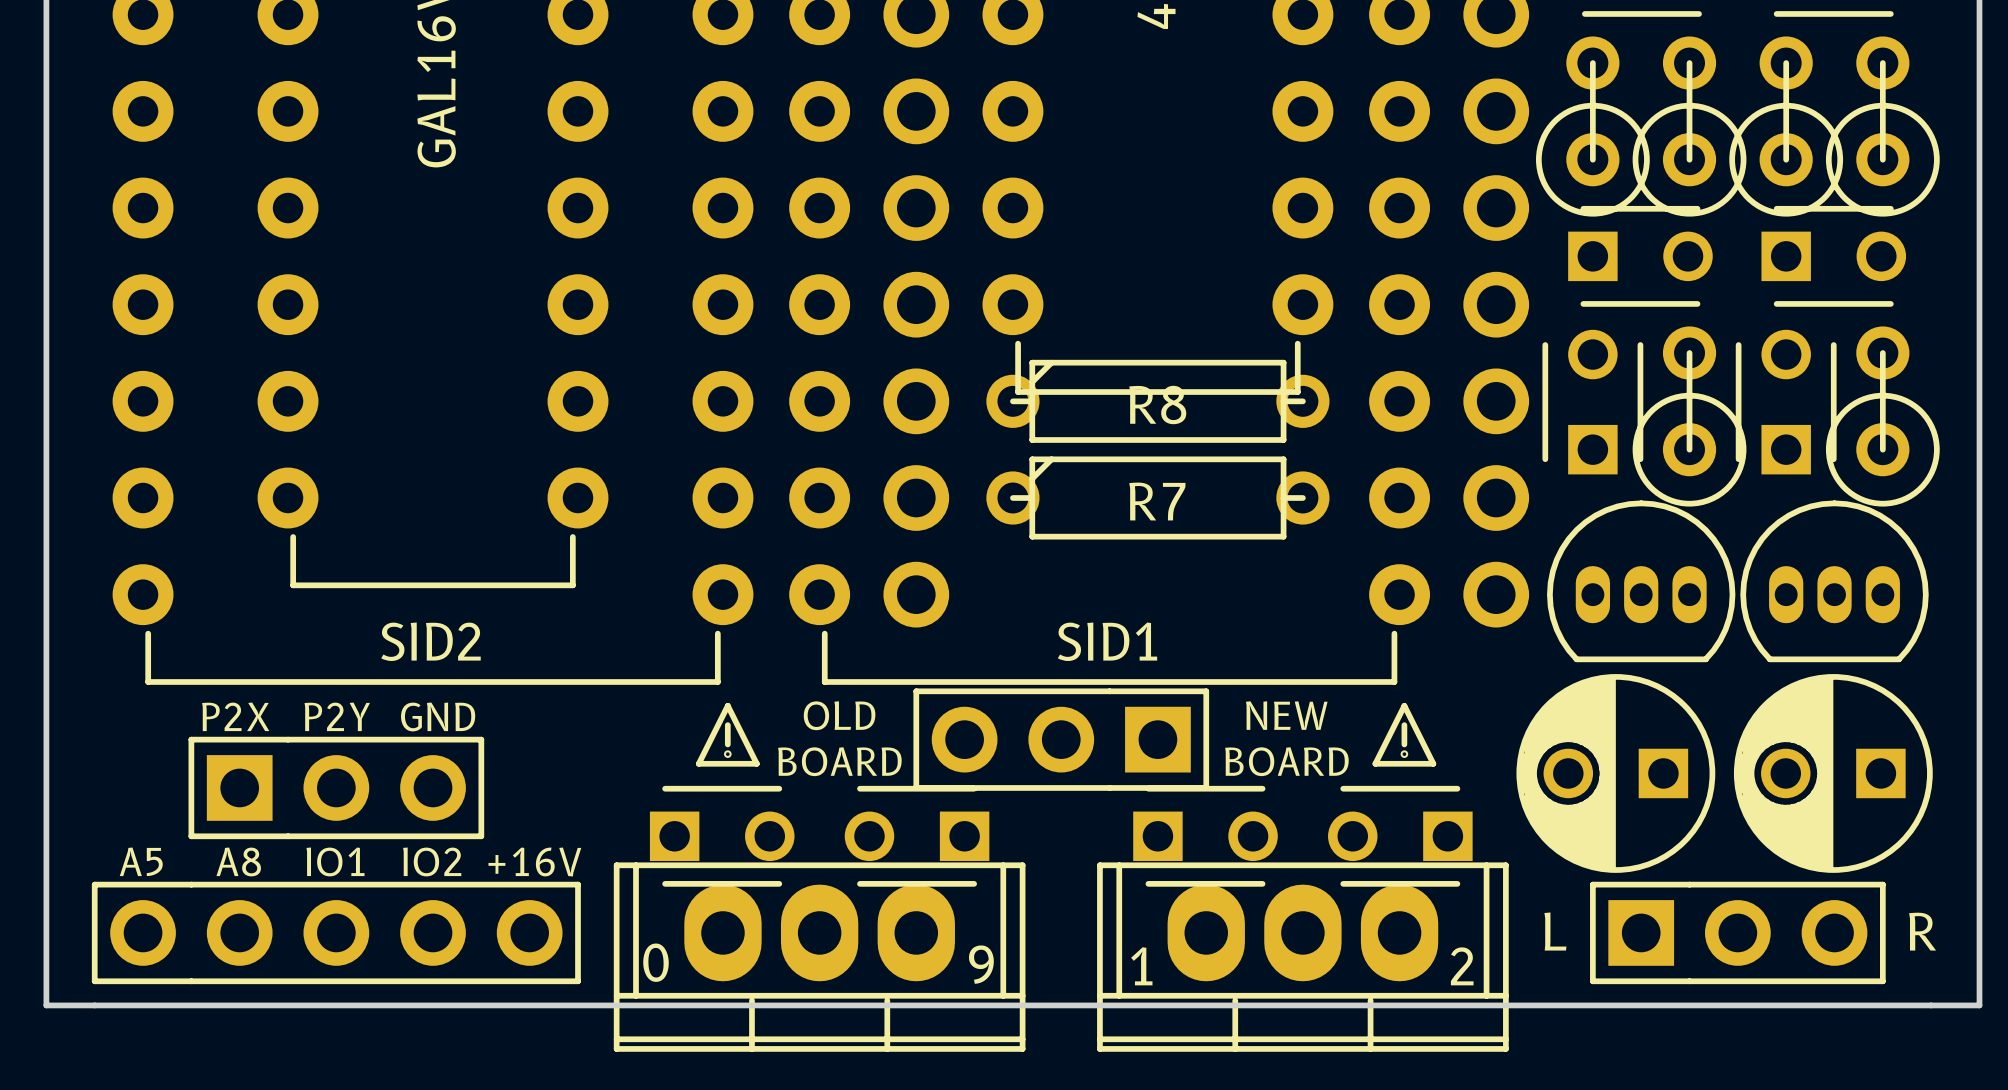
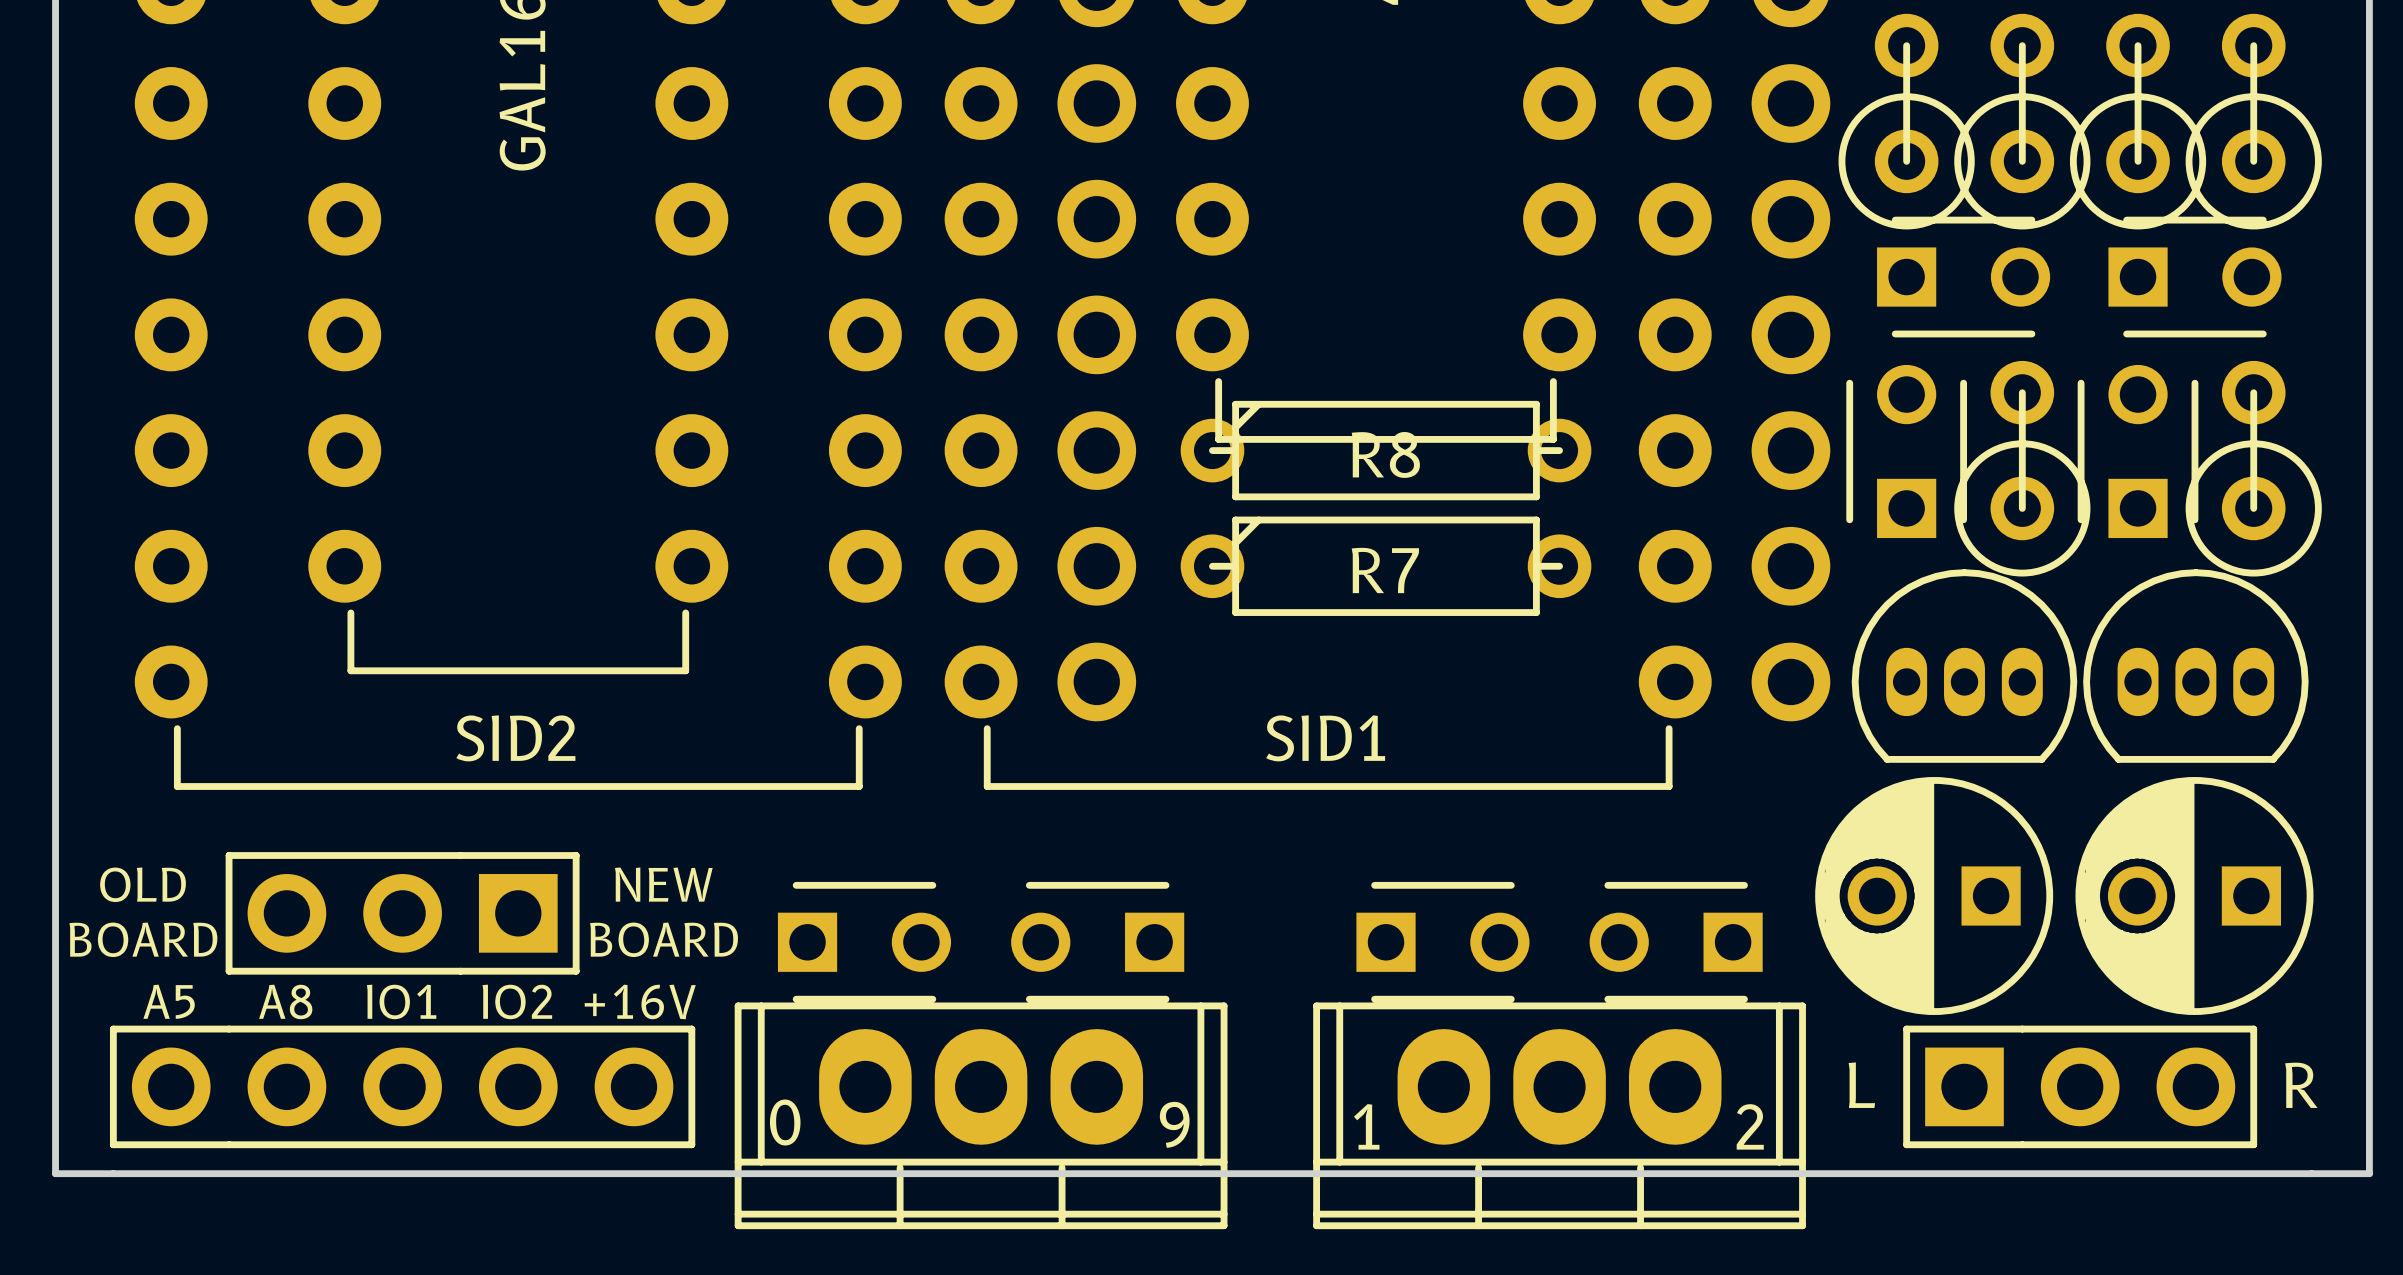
drawing: [695, 702, 760, 767] -> none
drawing: [1372, 702, 1437, 767] -> none
text position: OLD (839, 715) -> OLD (143, 884)
text position: NEW (1286, 715) -> NEW (663, 884)
text: P2X (235, 716) -> none
text: P2Y (337, 716) -> none
text: GND (438, 716) -> none
part: (1061, 739) -> none
text position: BOARD (839, 761) -> BOARD (664, 939)
text: BOARD (1286, 761) -> none
part rotation: 0° (336, 787) -> 180° (402, 913)
text: none -> BOARD (143, 939)
part position: (722, 836) -> (864, 942)
part position: (917, 836) -> (1097, 942)
part position: (1205, 836) -> (1442, 942)
part position: (1400, 836) -> (1676, 942)

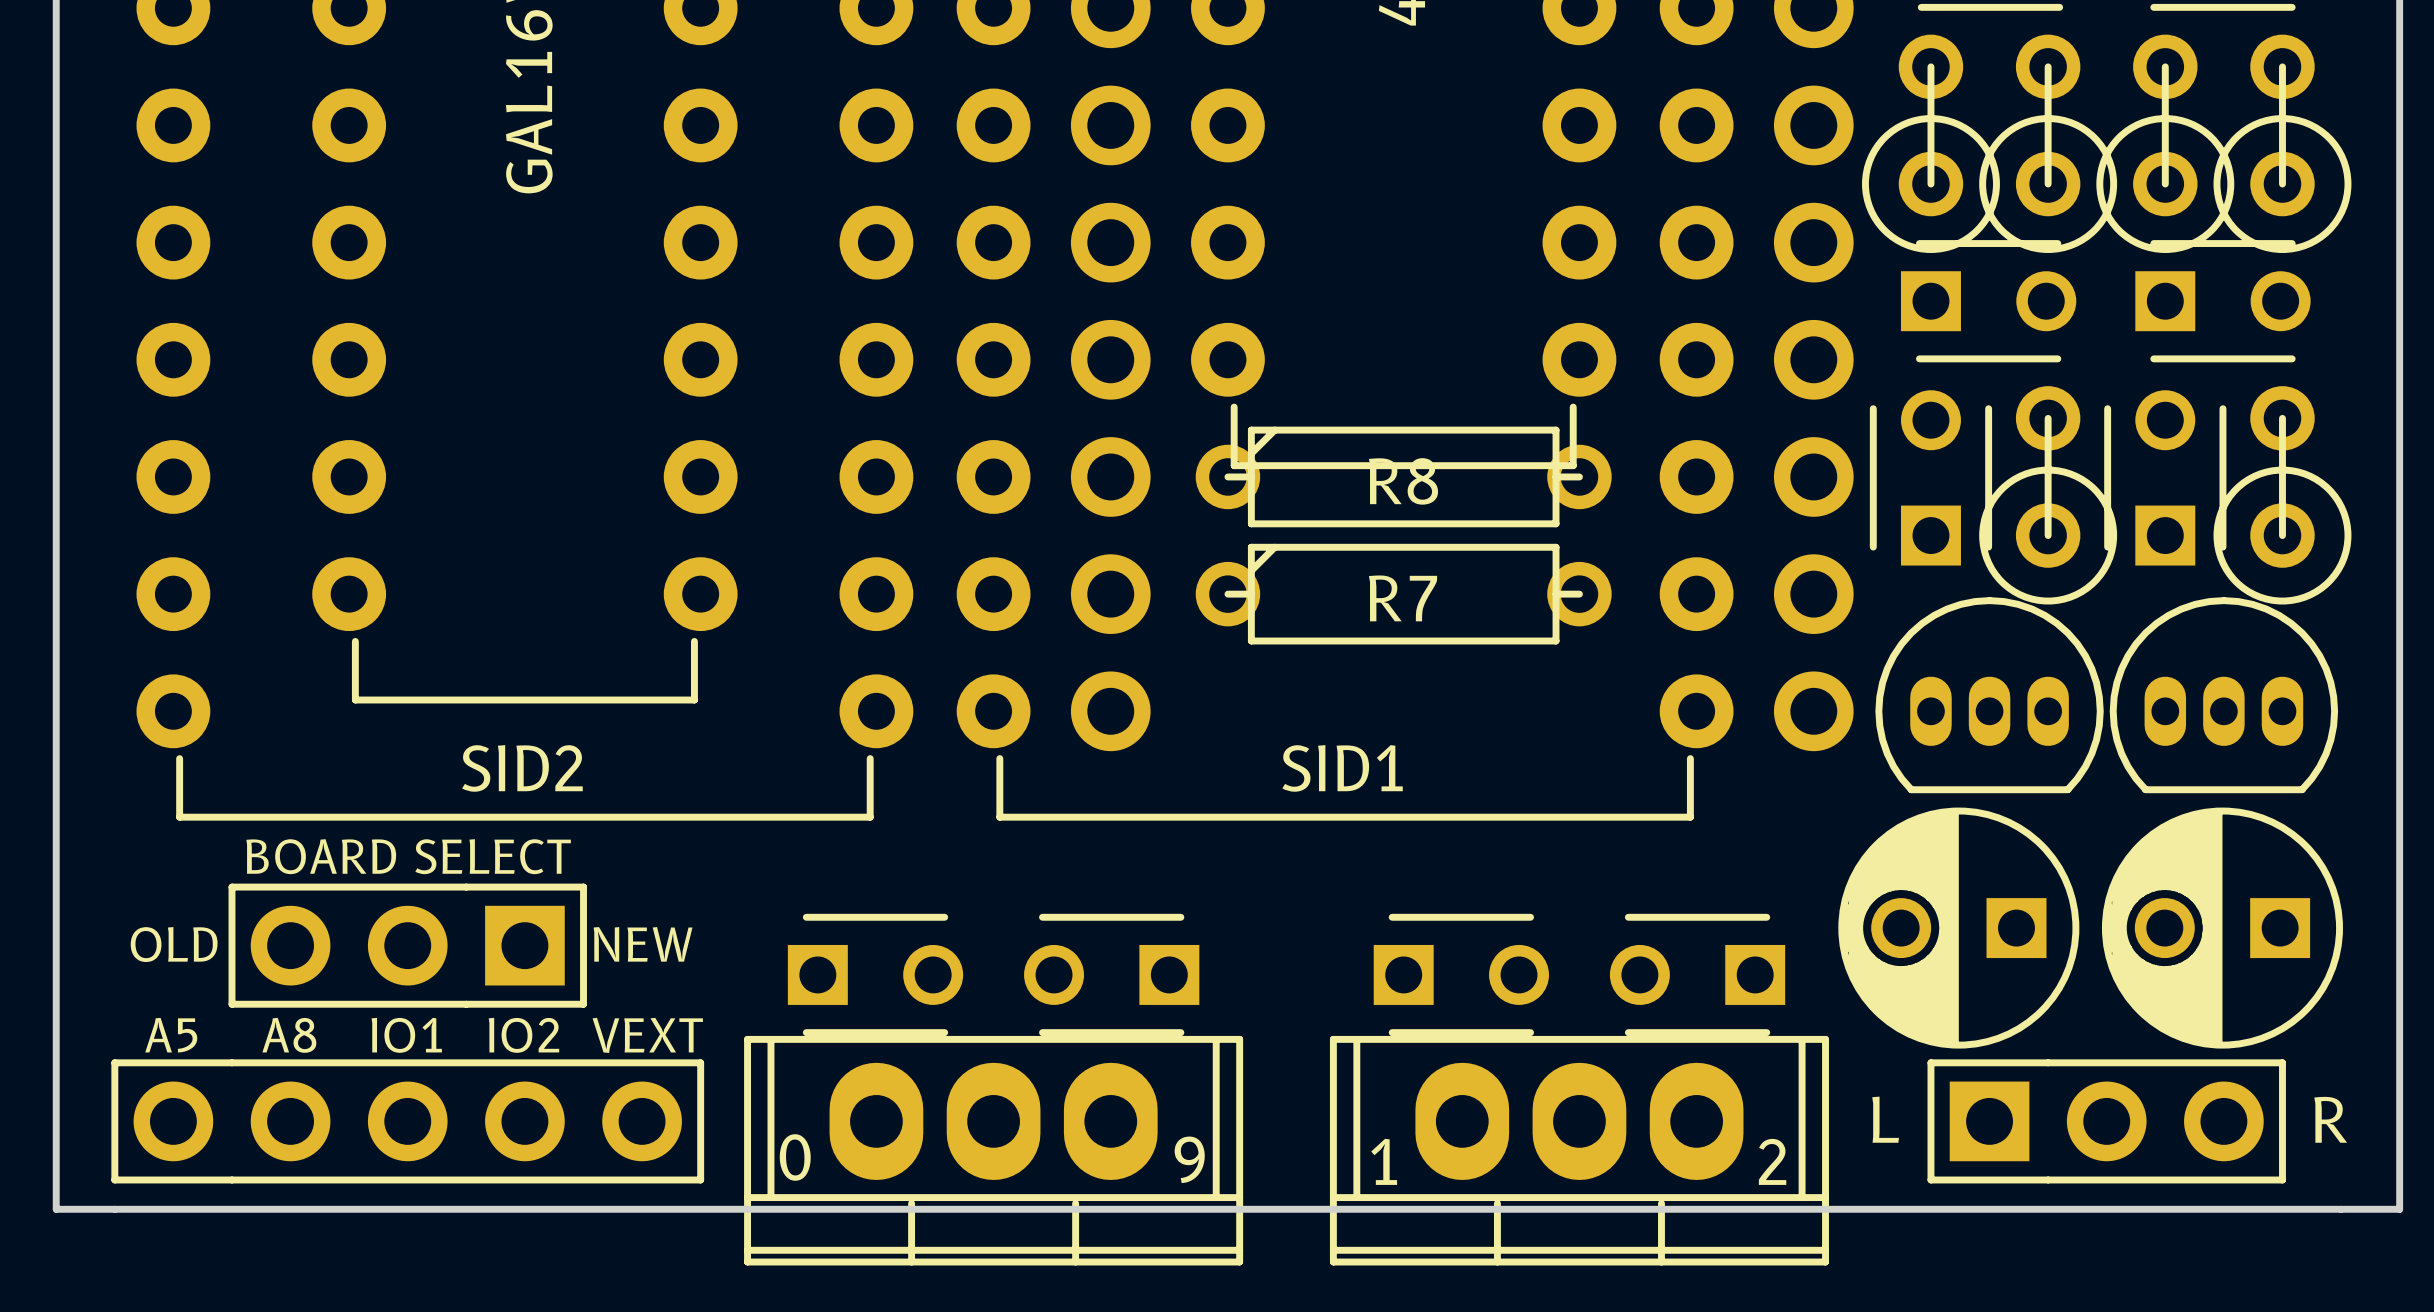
text: none -> BOARD SELECT (408, 856)
text position: OLD (143, 884) -> OLD (174, 944)
text position: NEW (663, 884) -> NEW (643, 944)
text: BOARD (143, 939) -> none
text: BOARD (664, 939) -> none
text: +16V (640, 1001) -> VEXT (647, 1035)

